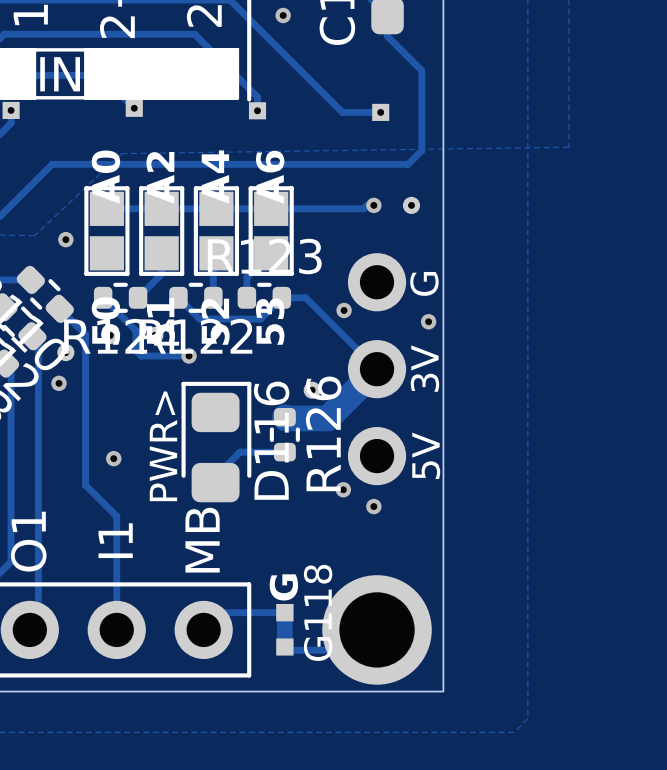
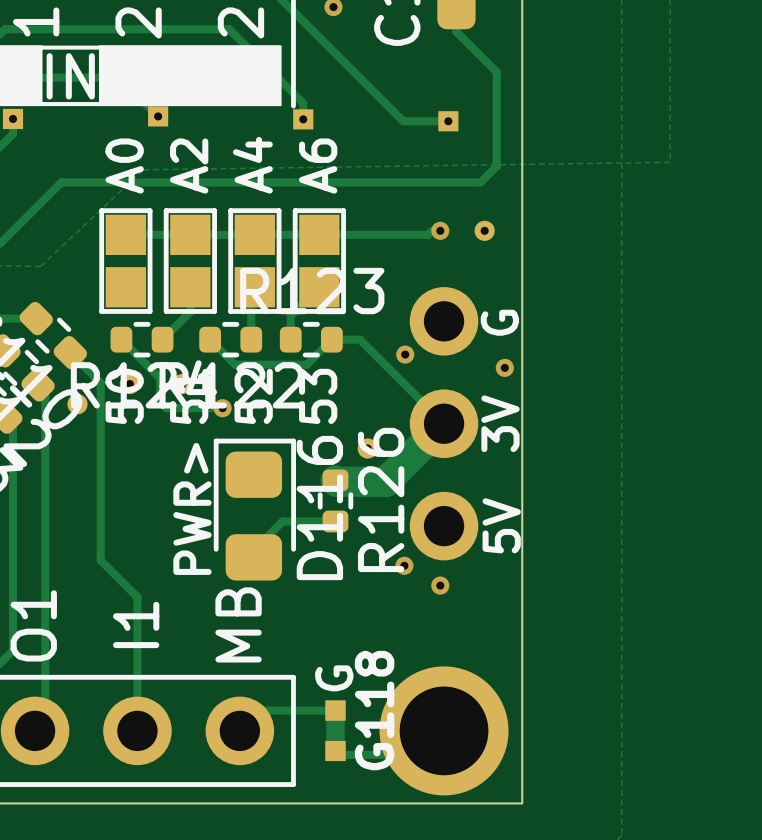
via: (65, 239) -> none
via: (59, 383) -> none
via: (113, 458) -> none

